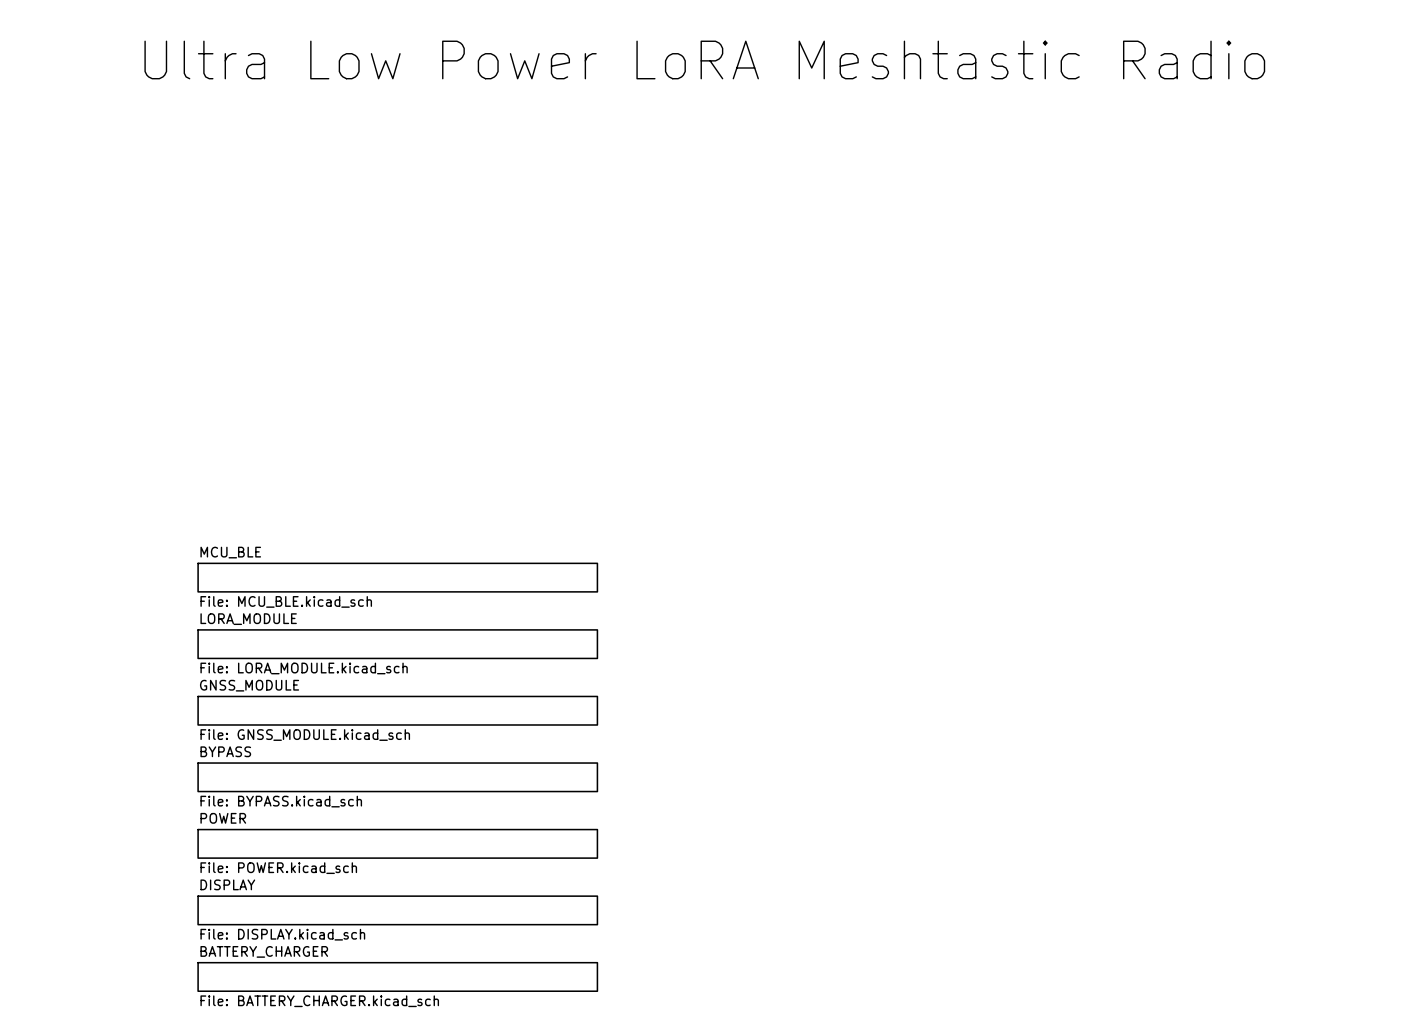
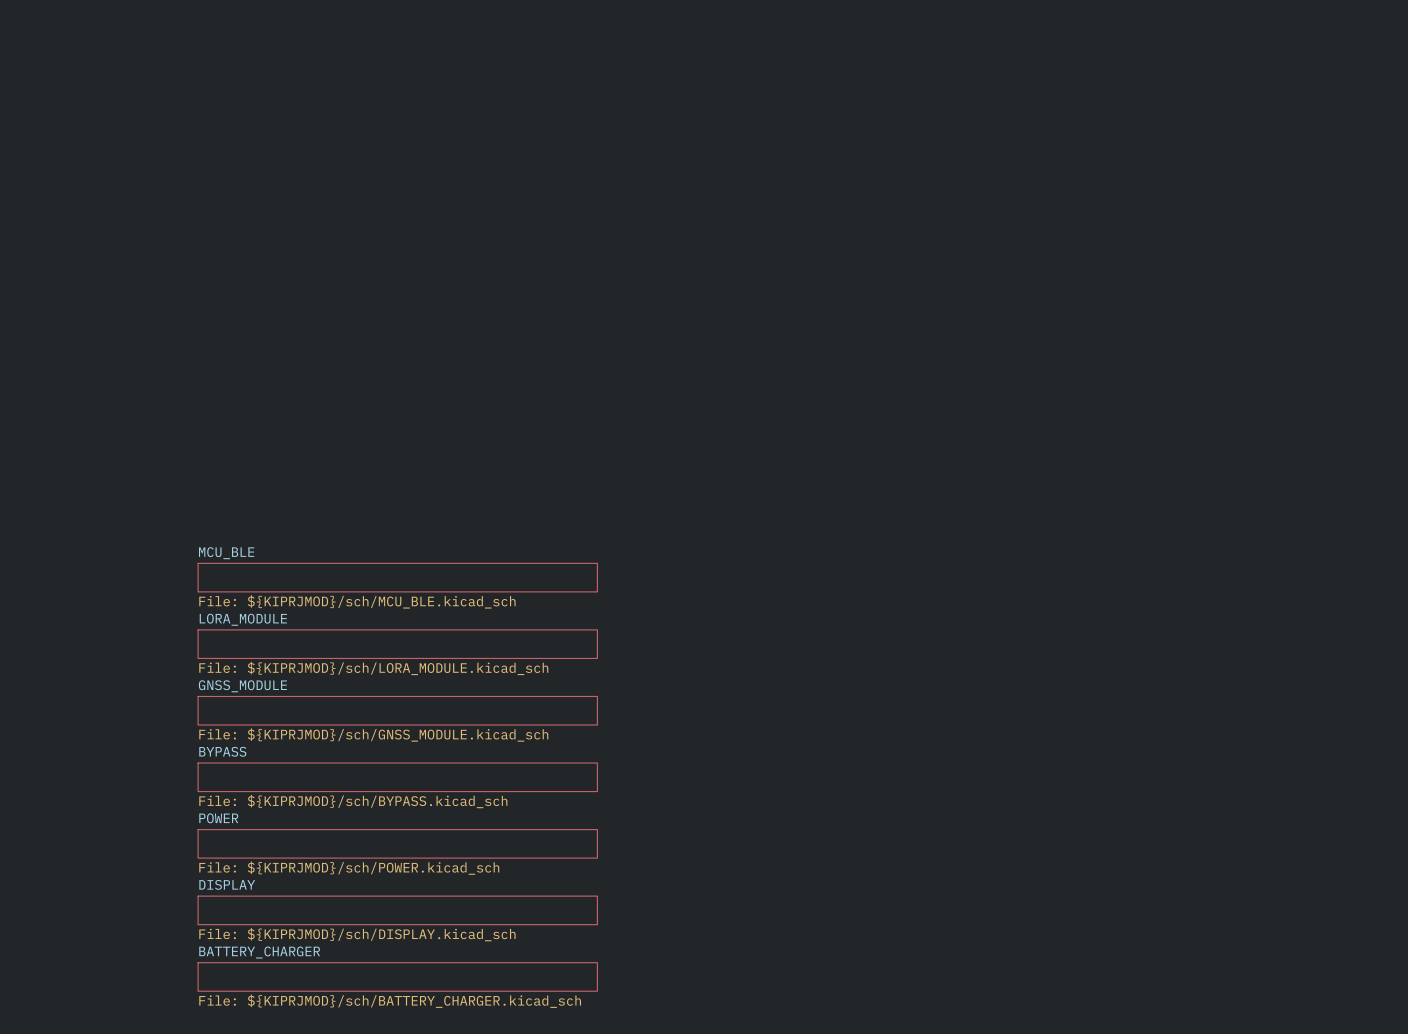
text: Ultra Low Power LoRA Meshtastic Radio (704, 59) -> none
sheet MCU_BLE value: File: MCU_BLE.kicad_sch (286, 601) -> File: ${KIPRJMOD}/sch/MCU_BLE.kicad_sch (357, 601)
sheet LORA_MODULE value: File: LORA_MODULE.kicad_sch (304, 668) -> File: ${KIPRJMOD}/sch/LORA_MODULE.kicad_sch (373, 668)
sheet GNSS_MODULE value: File: GNSS_MODULE.kicad_sch (305, 735) -> File: ${KIPRJMOD}/sch/GNSS_MODULE.kicad_sch (373, 734)
sheet BYPASS value: File: BYPASS.kicad_sch (281, 801) -> File: ${KIPRJMOD}/sch/BYPASS.kicad_sch (353, 801)
sheet POWER value: File: POWER.kicad_sch (278, 868) -> File: ${KIPRJMOD}/sch/POWER.kicad_sch (349, 868)
sheet DISPLAY value: File: DISPLAY.kicad_sch (282, 934) -> File: ${KIPRJMOD}/sch/DISPLAY.kicad_sch (357, 934)
sheet BATTERY_CHARGER value: File: BATTERY_CHARGER.kicad_sch (319, 1001) -> File: ${KIPRJMOD}/sch/BATTERY_CHARGER.kicad_sch (390, 1001)

